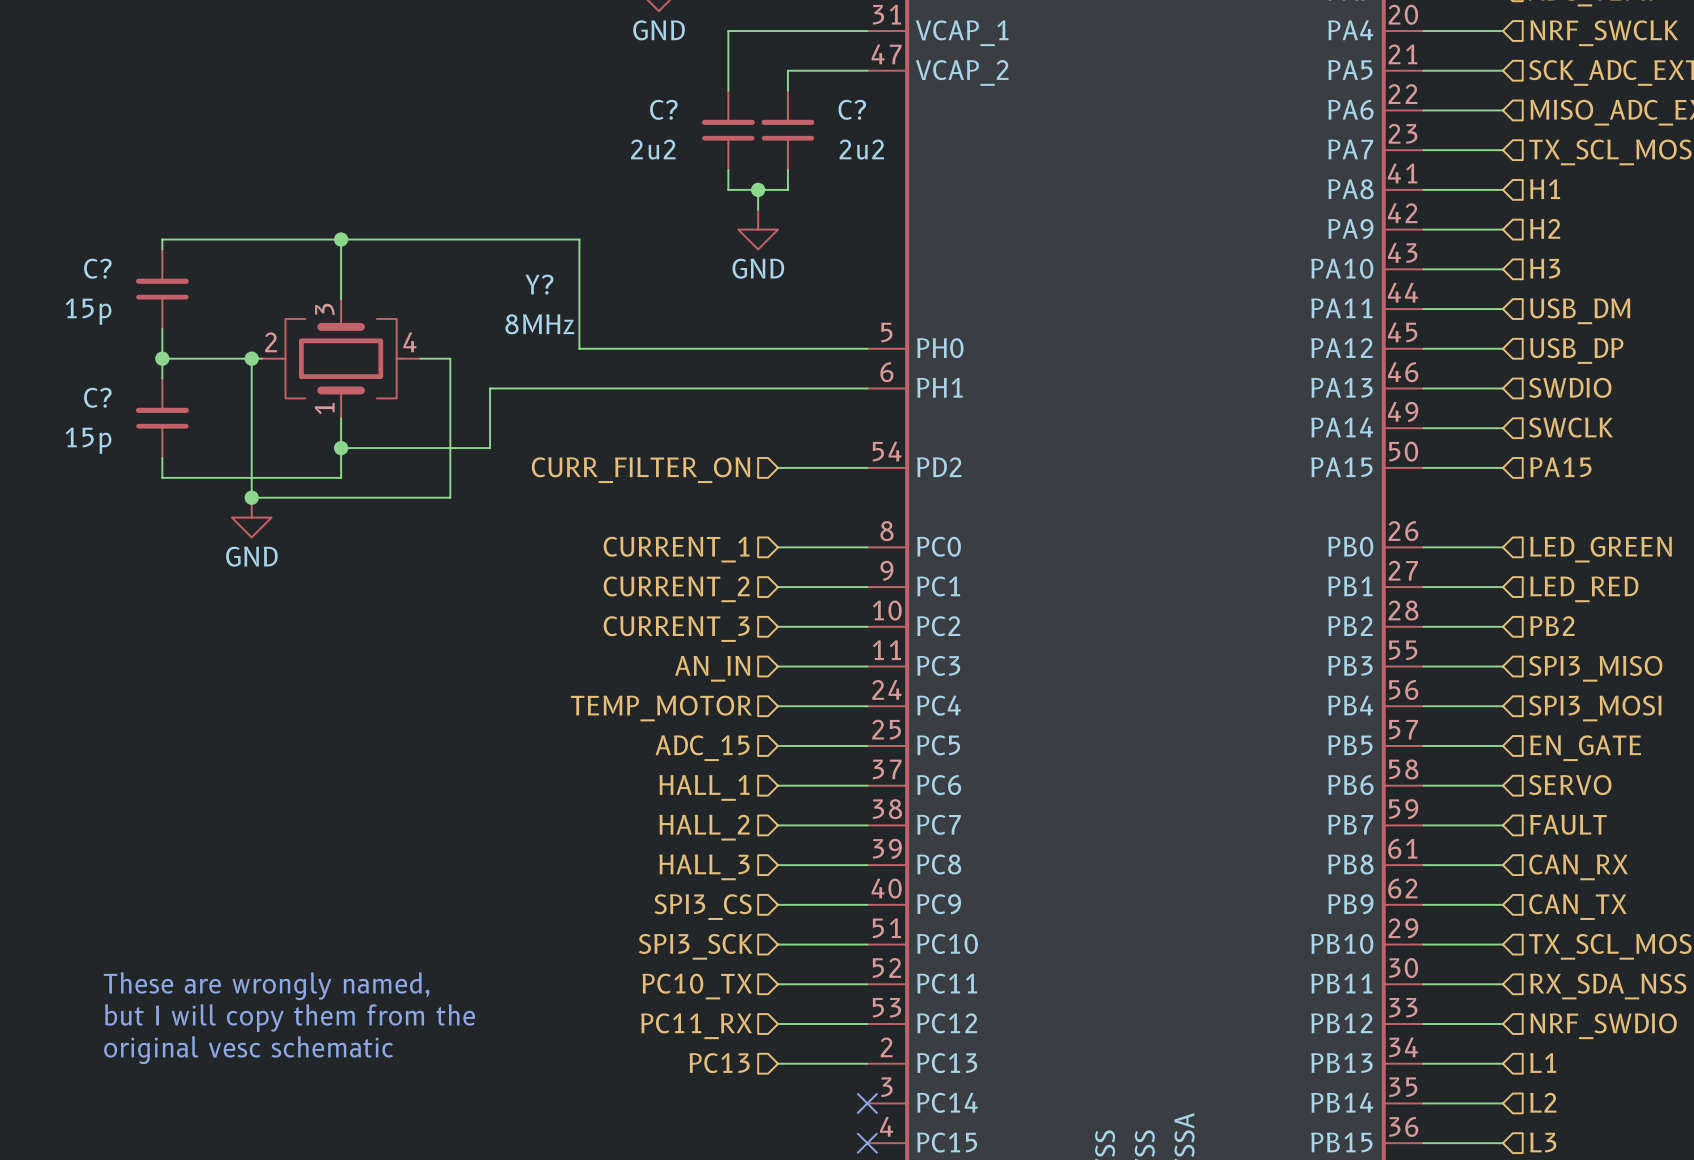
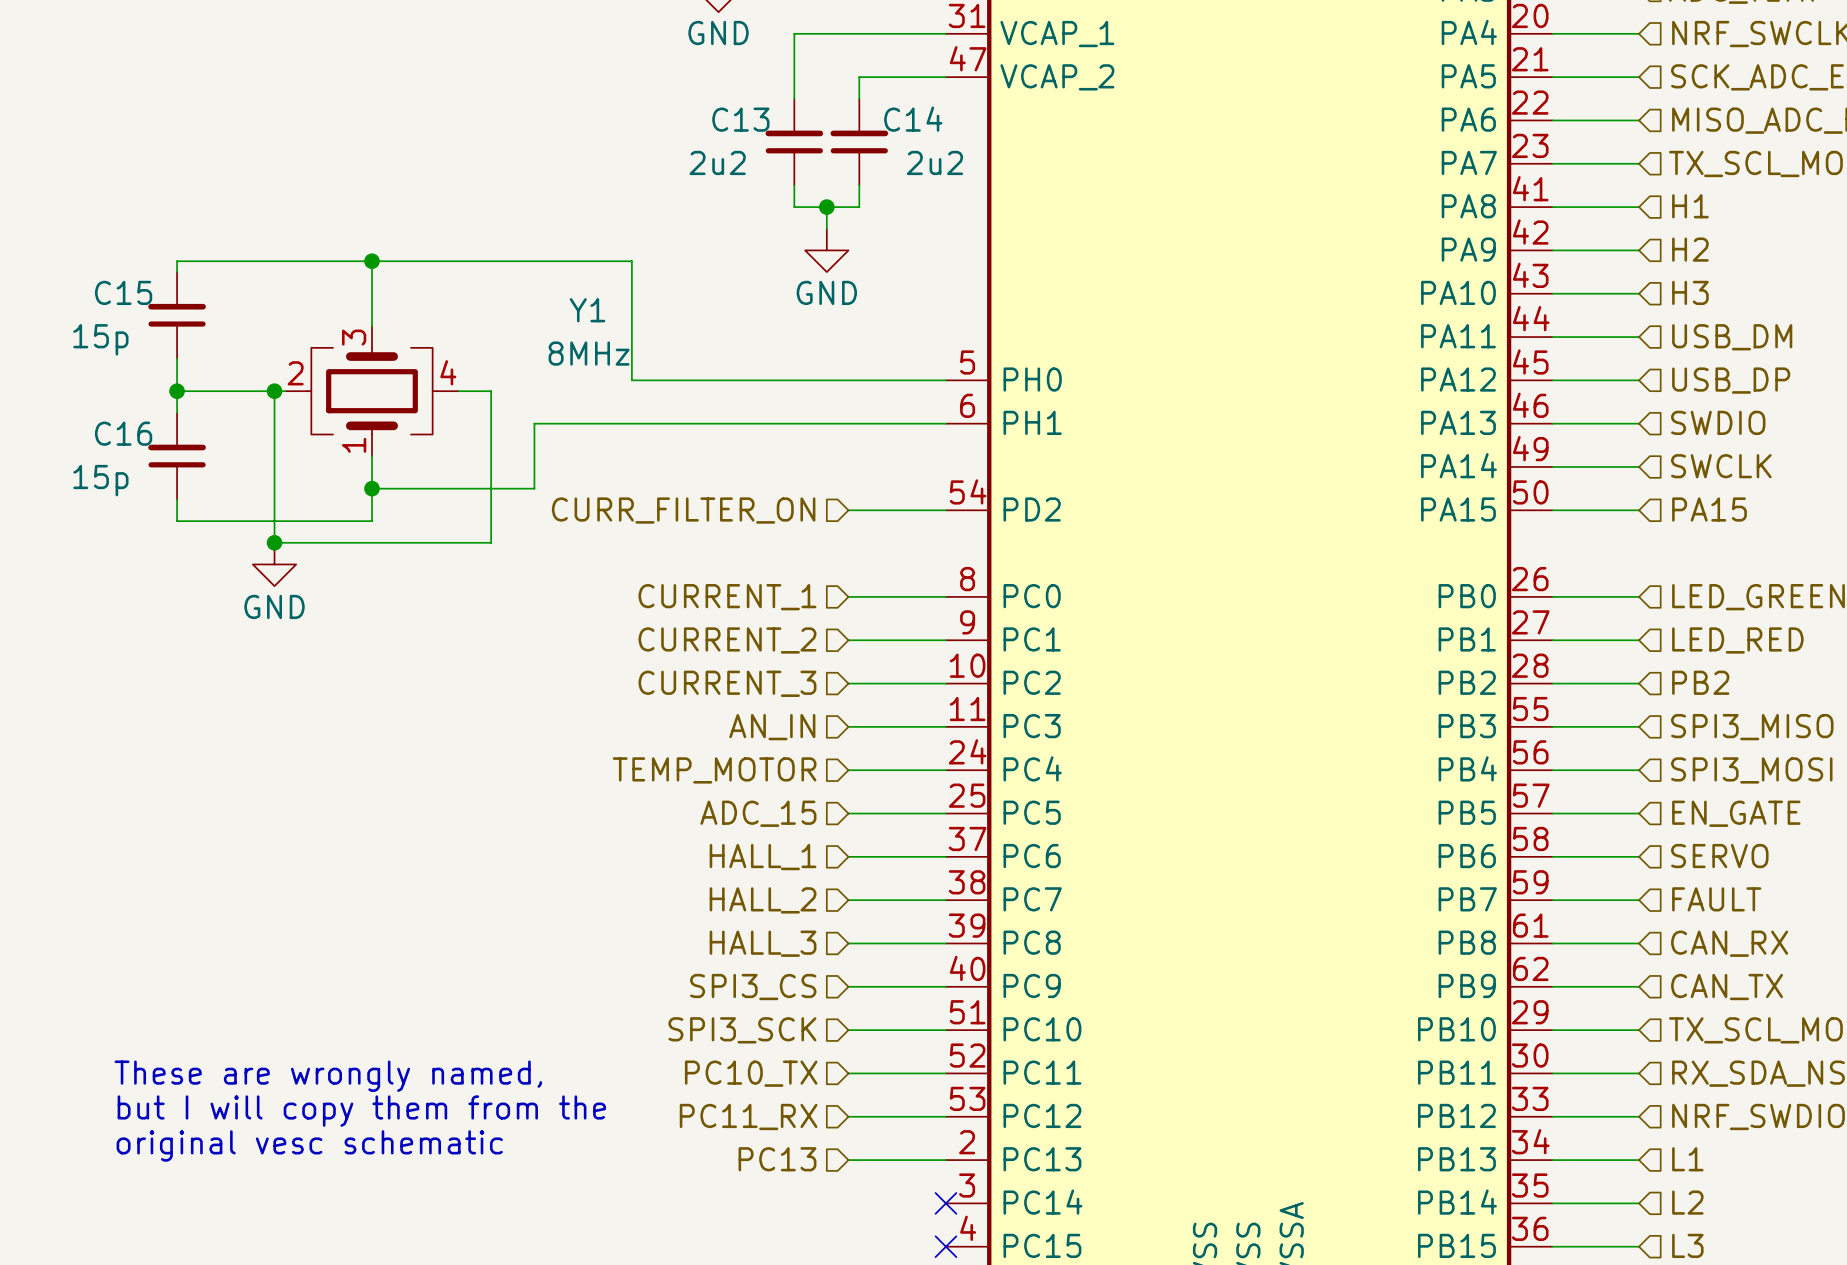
C? name: C? (663, 109) -> C13 (740, 119)
C? name: C? (852, 109) -> C14 (913, 119)
C? name: C? (97, 268) -> C15 (123, 292)
Y? name: Y? (539, 284) -> Y1 (587, 310)
C? name: C? (97, 397) -> C16 (123, 433)

